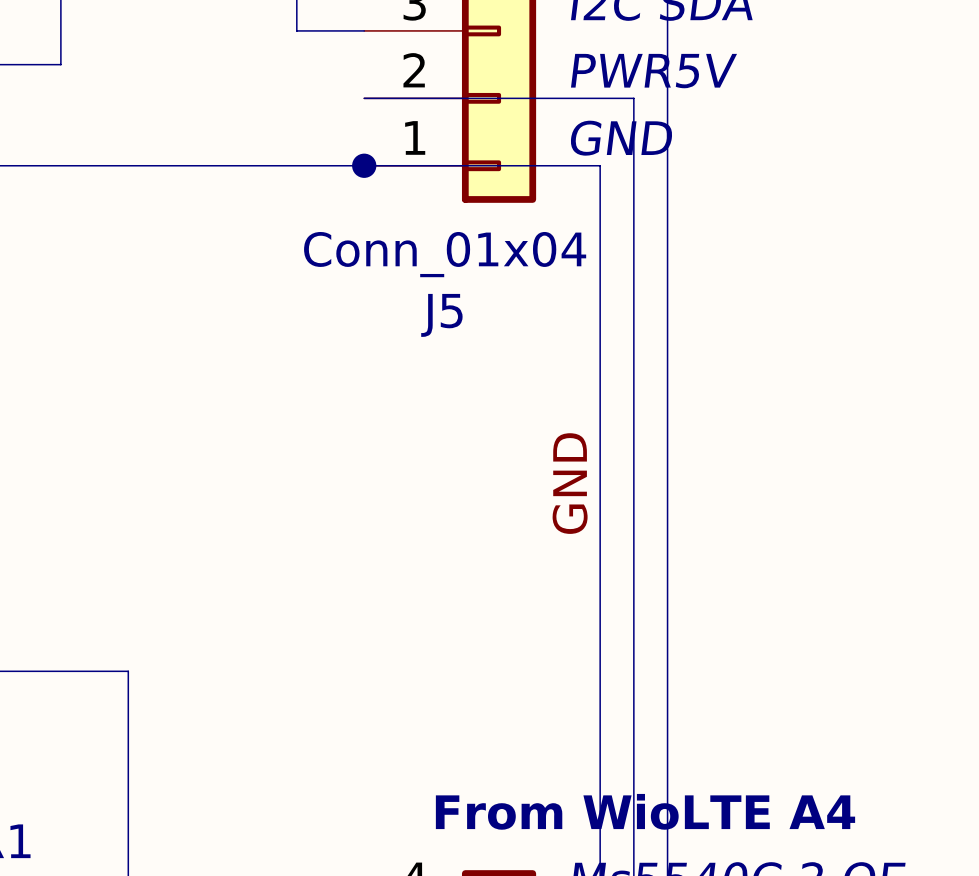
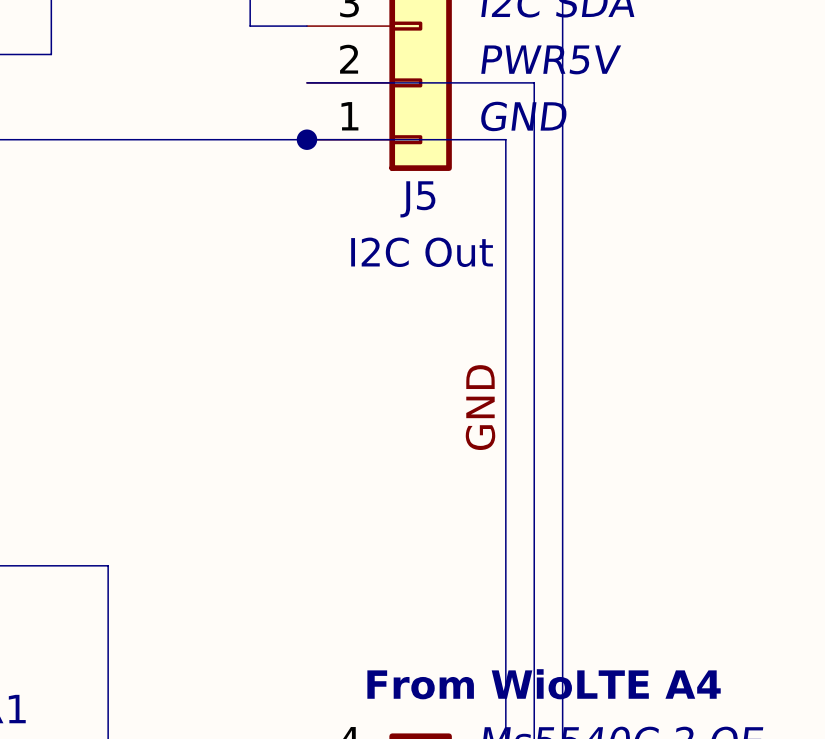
J5 value: Conn_01x04 (445, 254) -> I2C Out (422, 252)
J5 name position: J5 (441, 315) -> J5 (417, 199)

